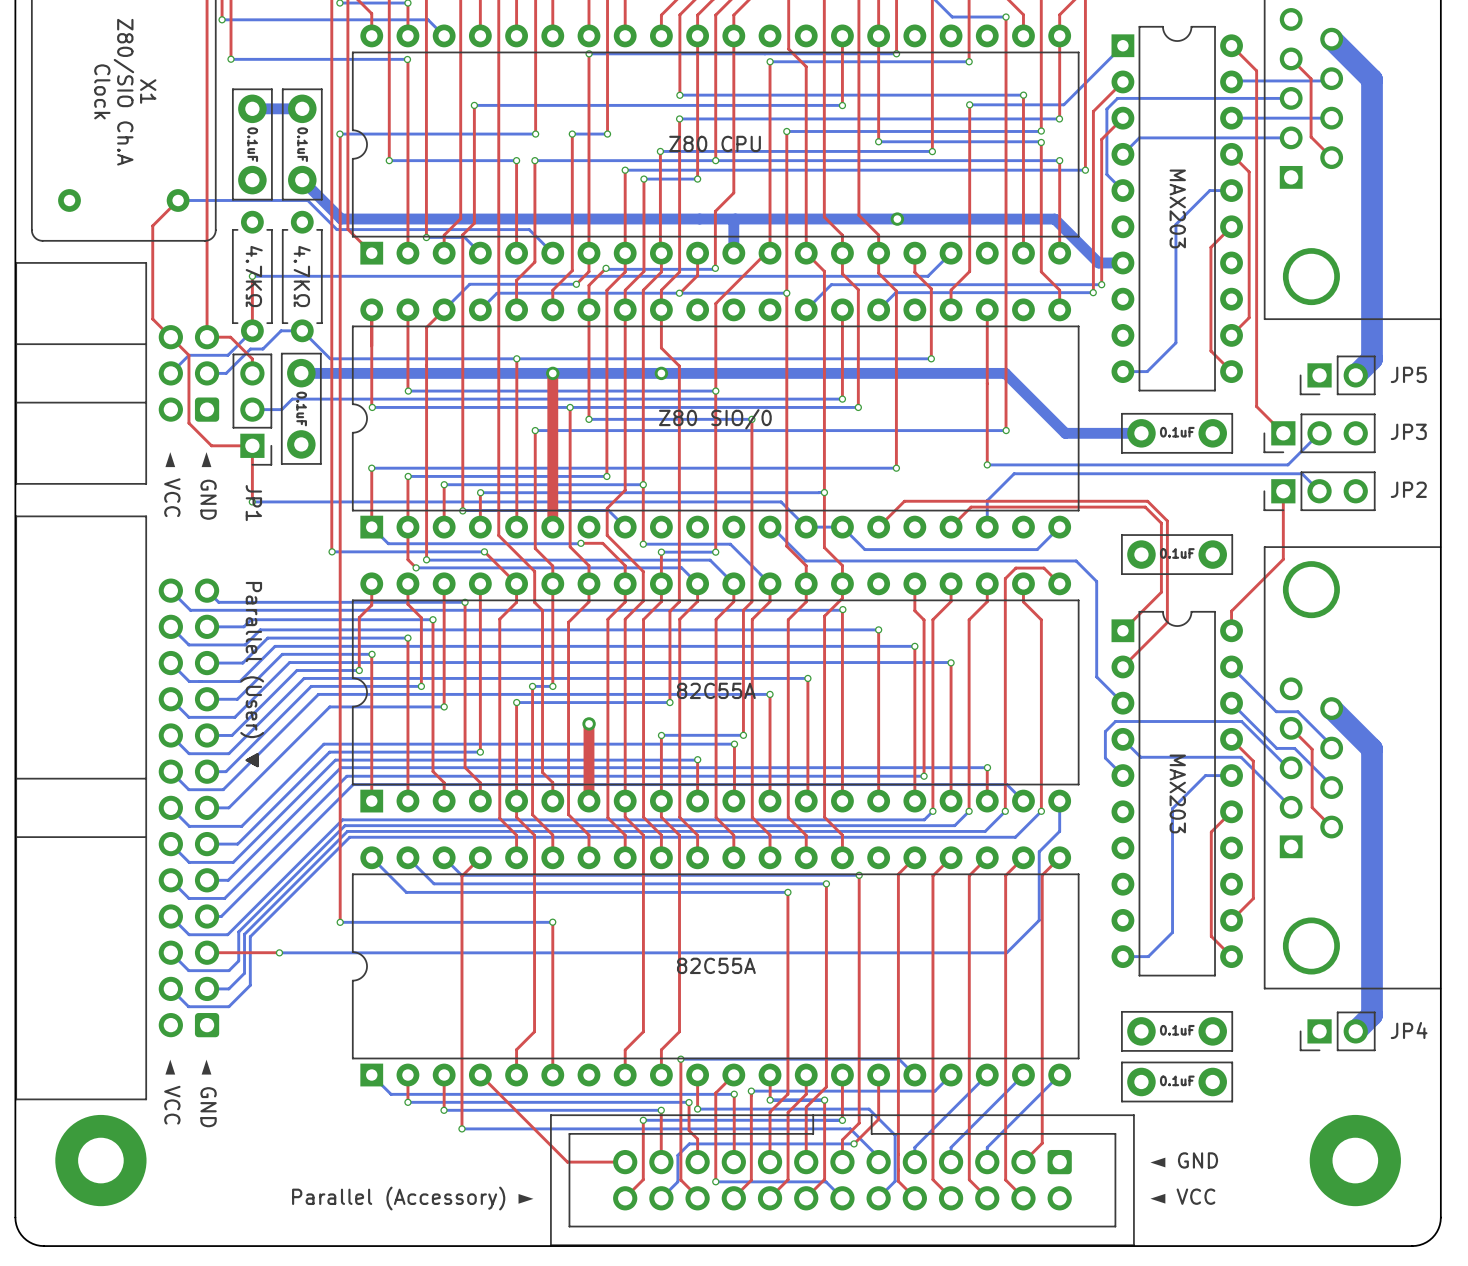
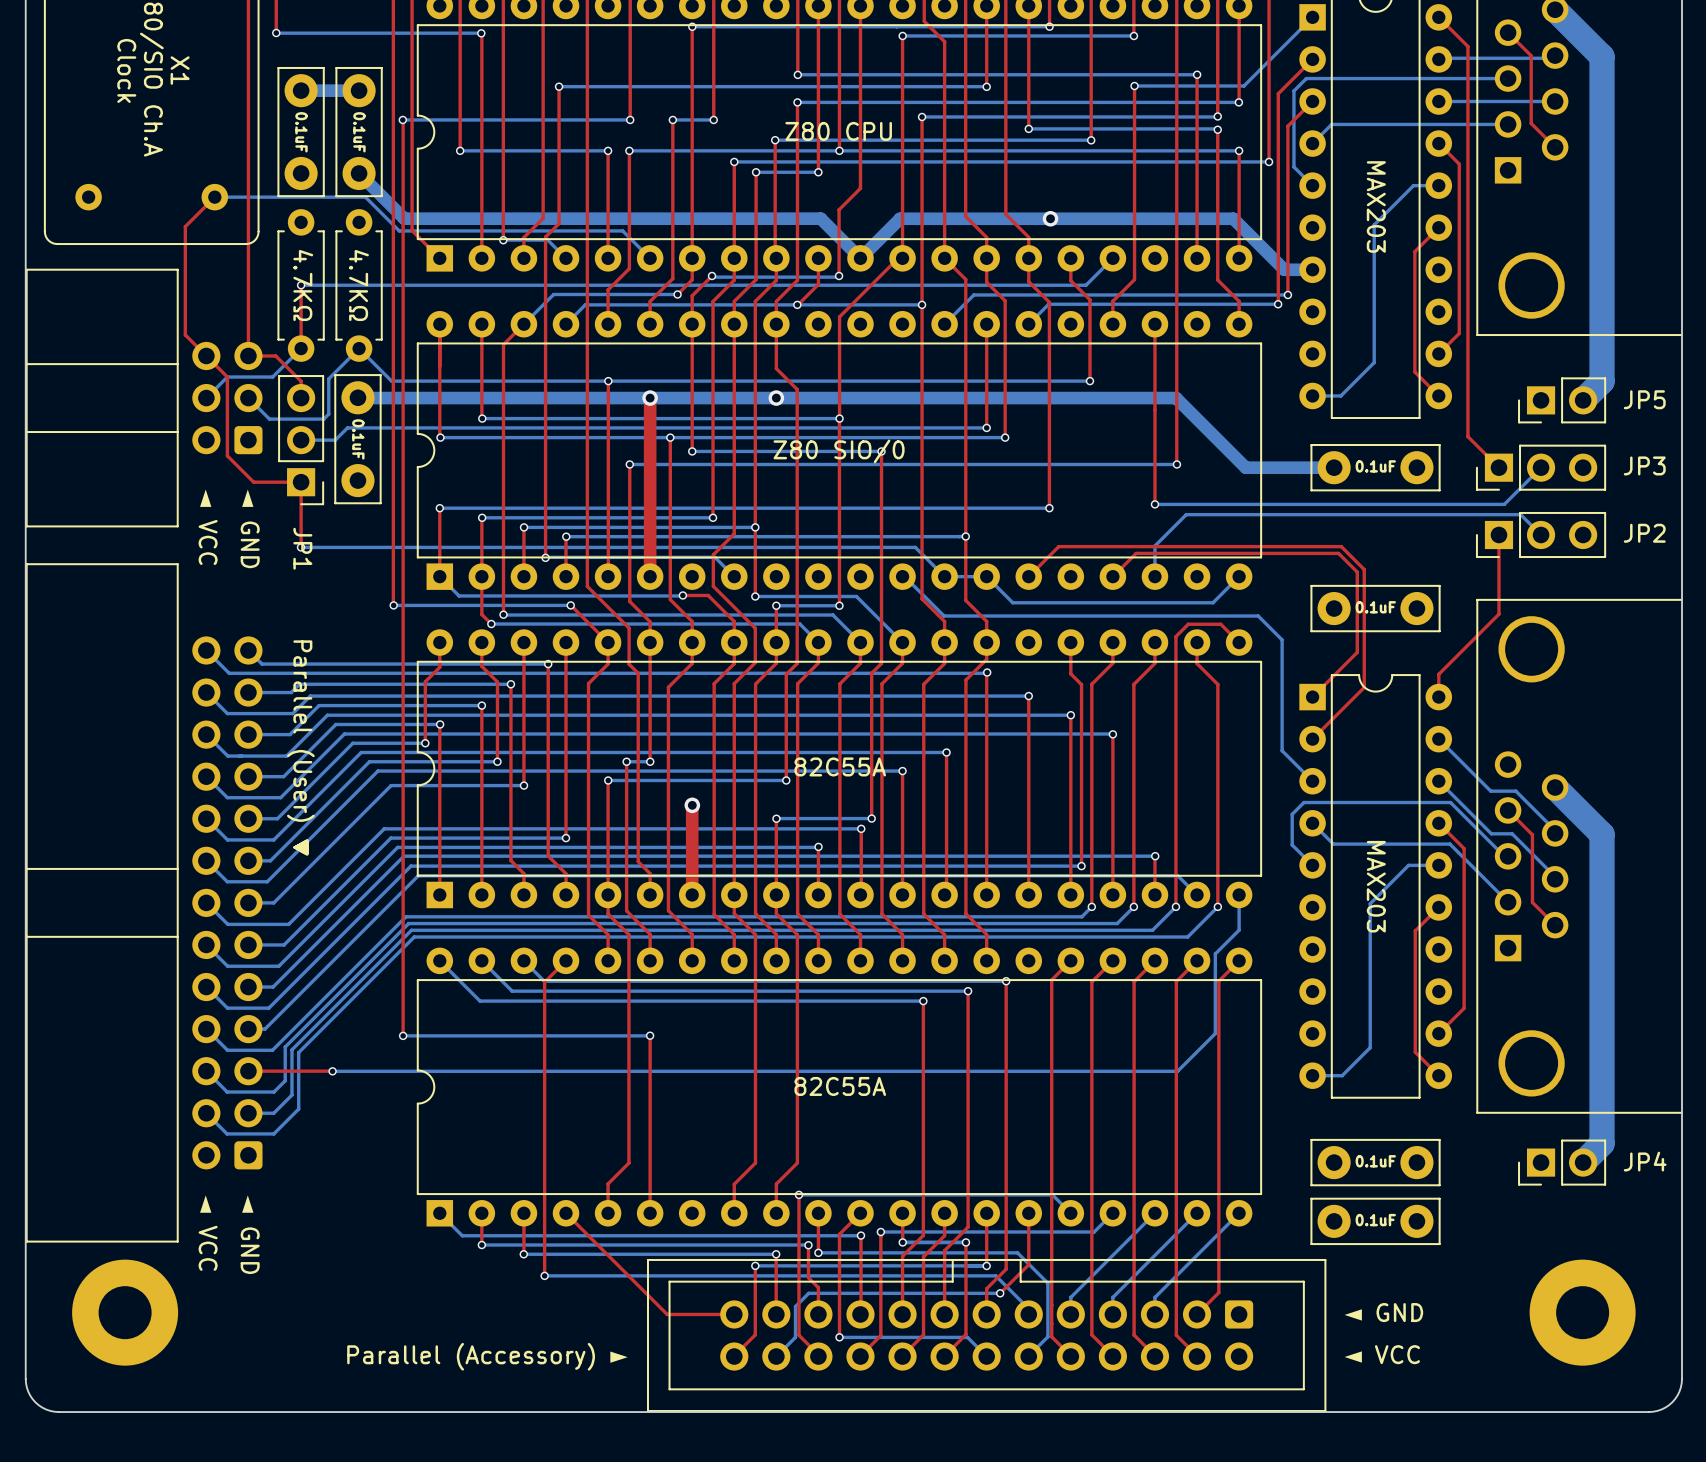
bottom track: (699, 219) (897, 219) -> (861, 257) (900, 218) (1050, 218)
bottom track: (733, 220) (733, 253) -> (820, 218) (860, 258)
bottom track: (302, 330) (281, 330) (262, 349) (250, 349) (226, 373) (207, 373) -> (359, 348) (328, 378) (328, 414) (323, 419) (269, 419) (248, 398)

